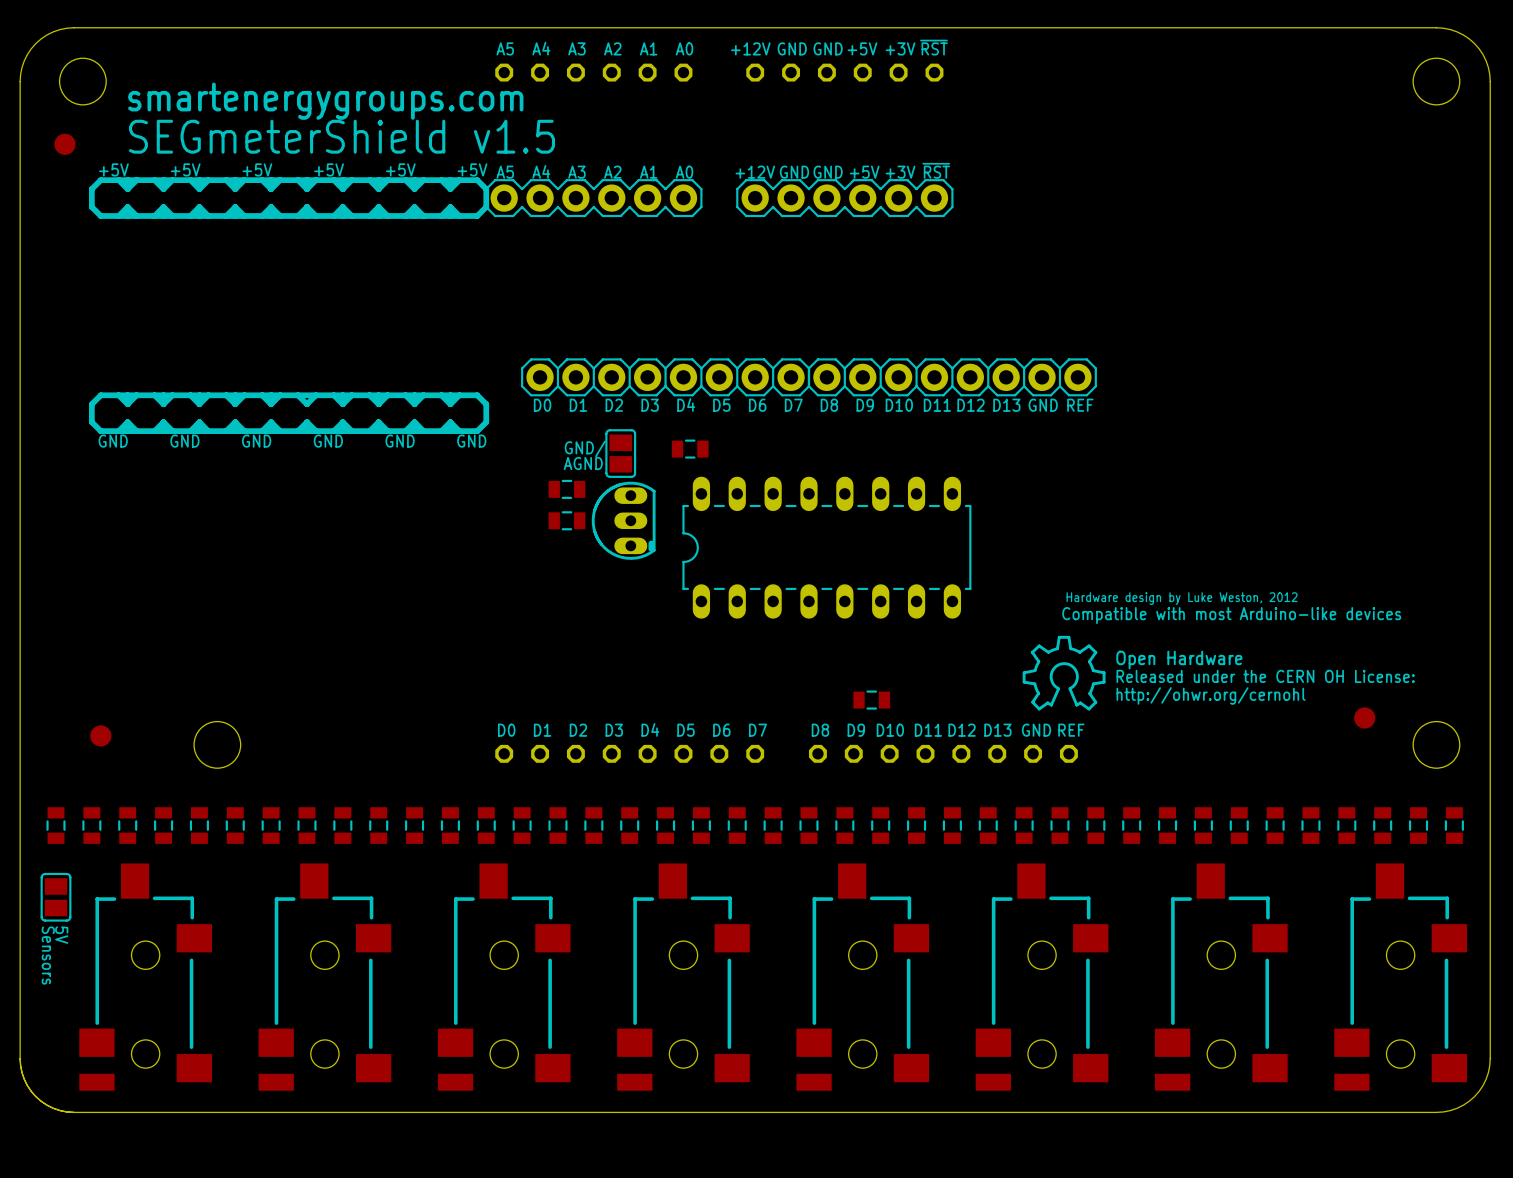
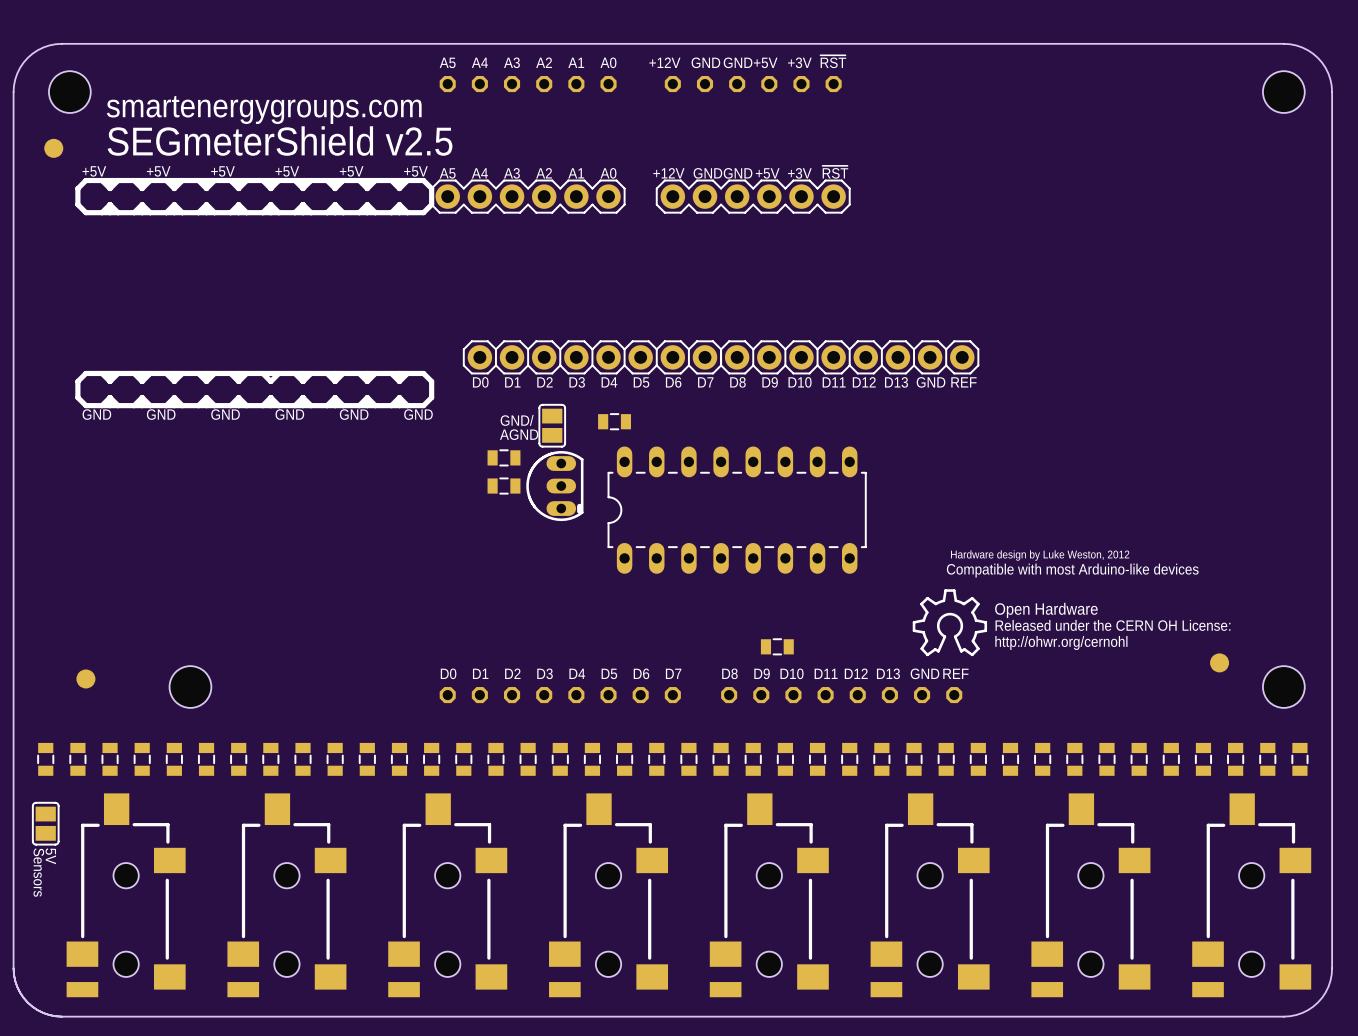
text: SEGmeterShield v1.5 (342, 136) -> SEGmeterShield v2.5 (280, 141)

